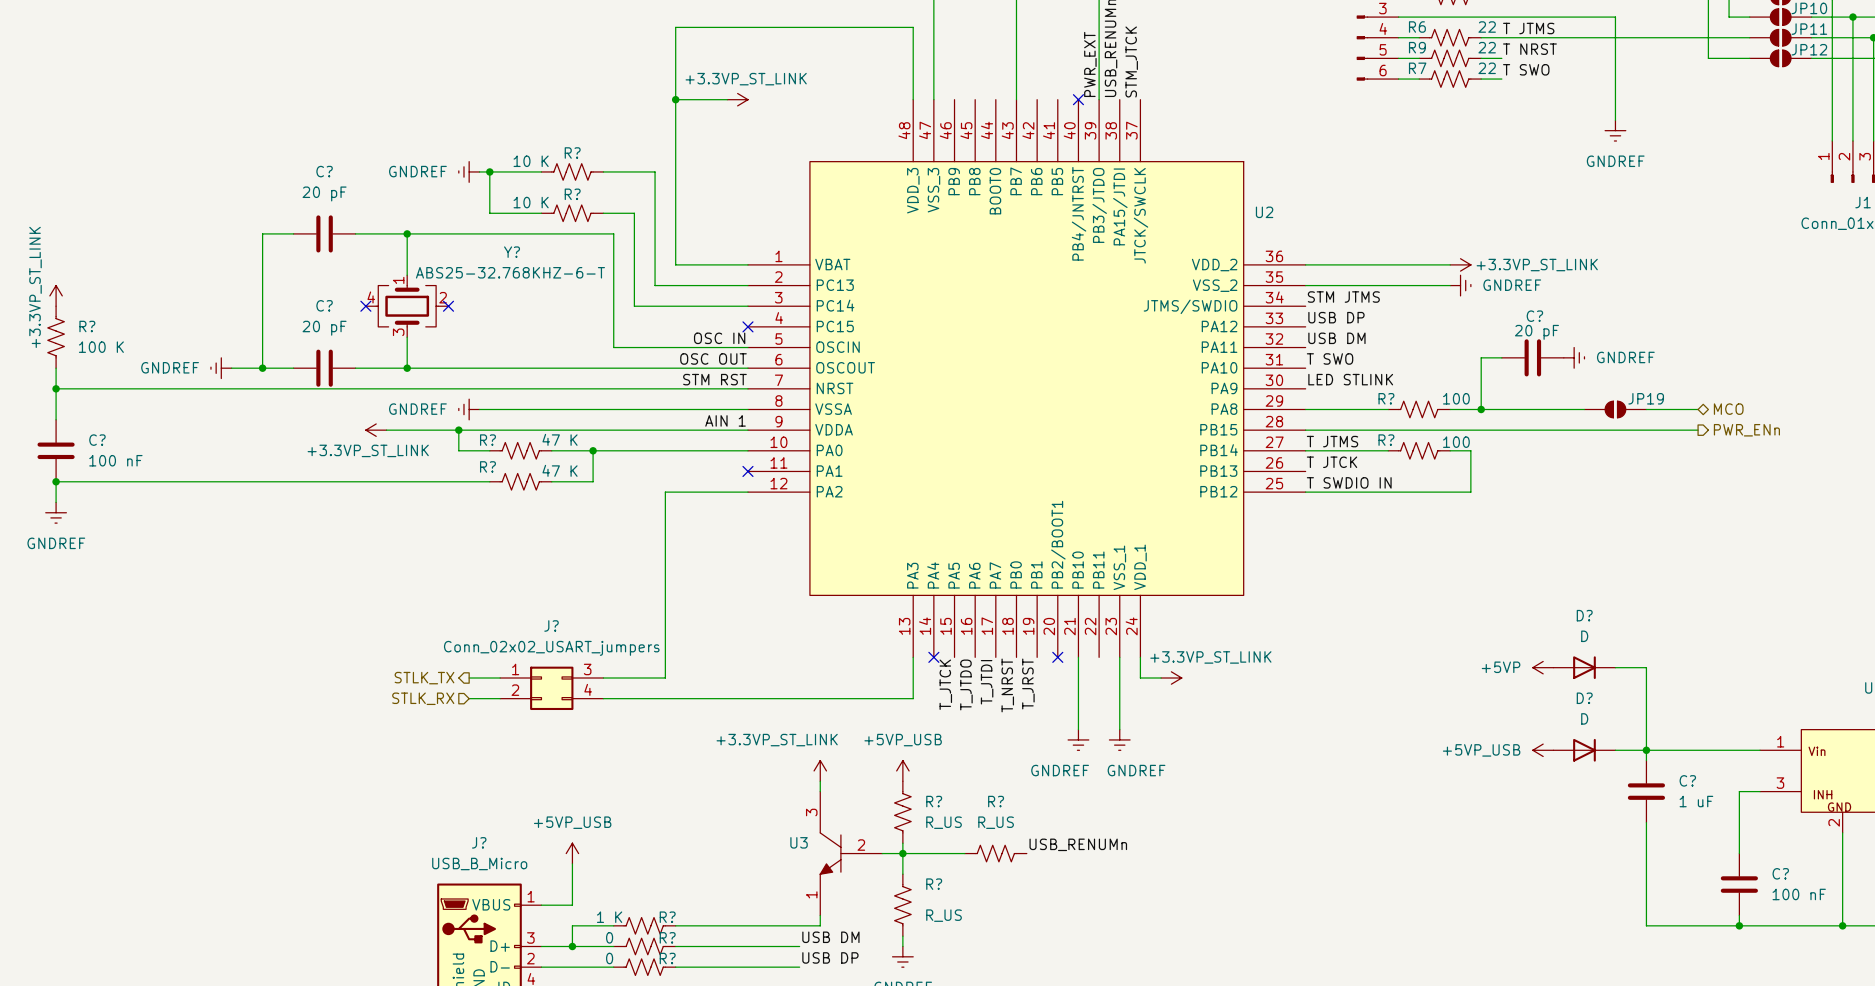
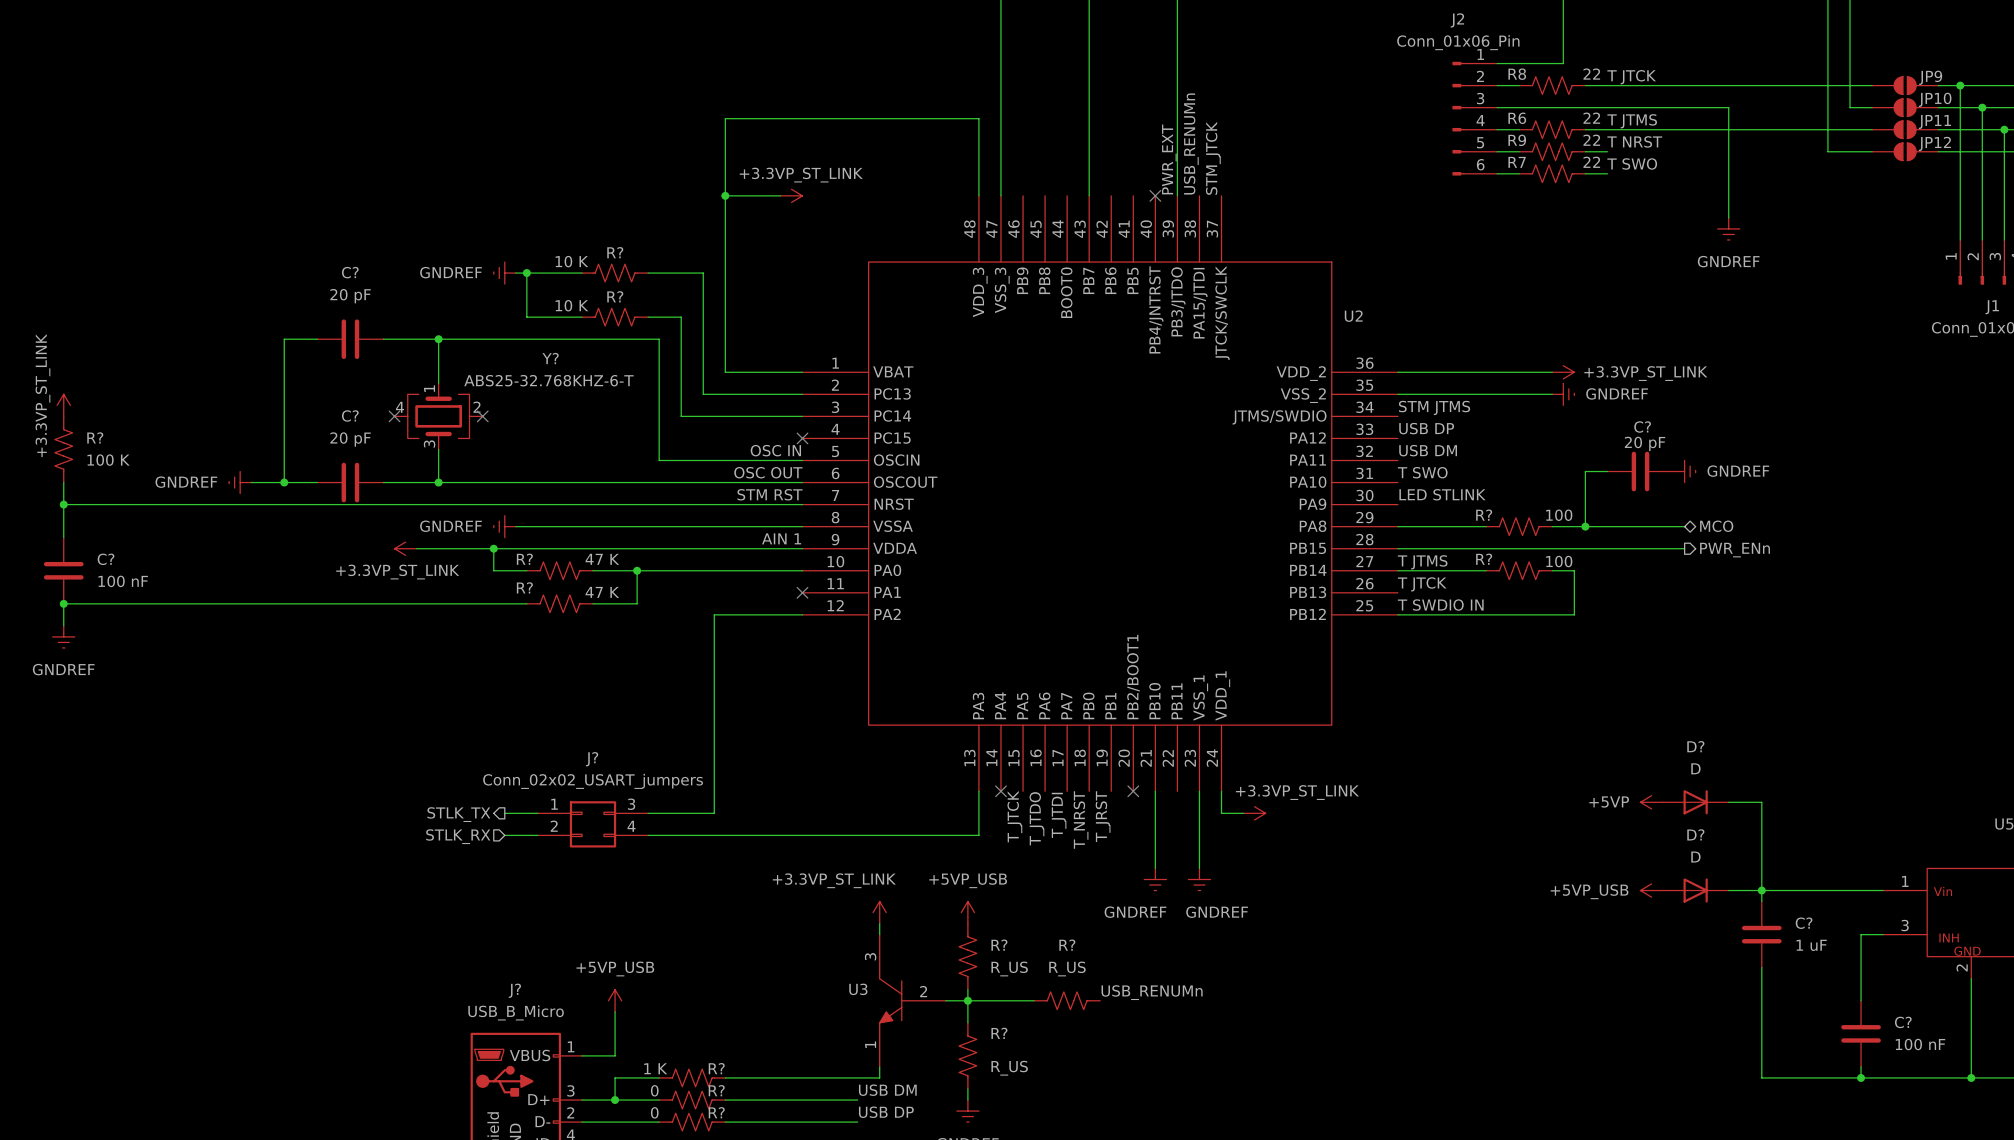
wire: (1574, 409) (1584, 409) -> none
JP19: (1615, 409) -> none
wire: (1646, 409) (1698, 409) -> none
hierarchical label position: MCO (1728, 409) -> MCO (1716, 526)
wire: (1574, 430) (1698, 430) -> none
hierarchical label position: PWR_ENn (1746, 430) -> PWR_ENn (1735, 550)

